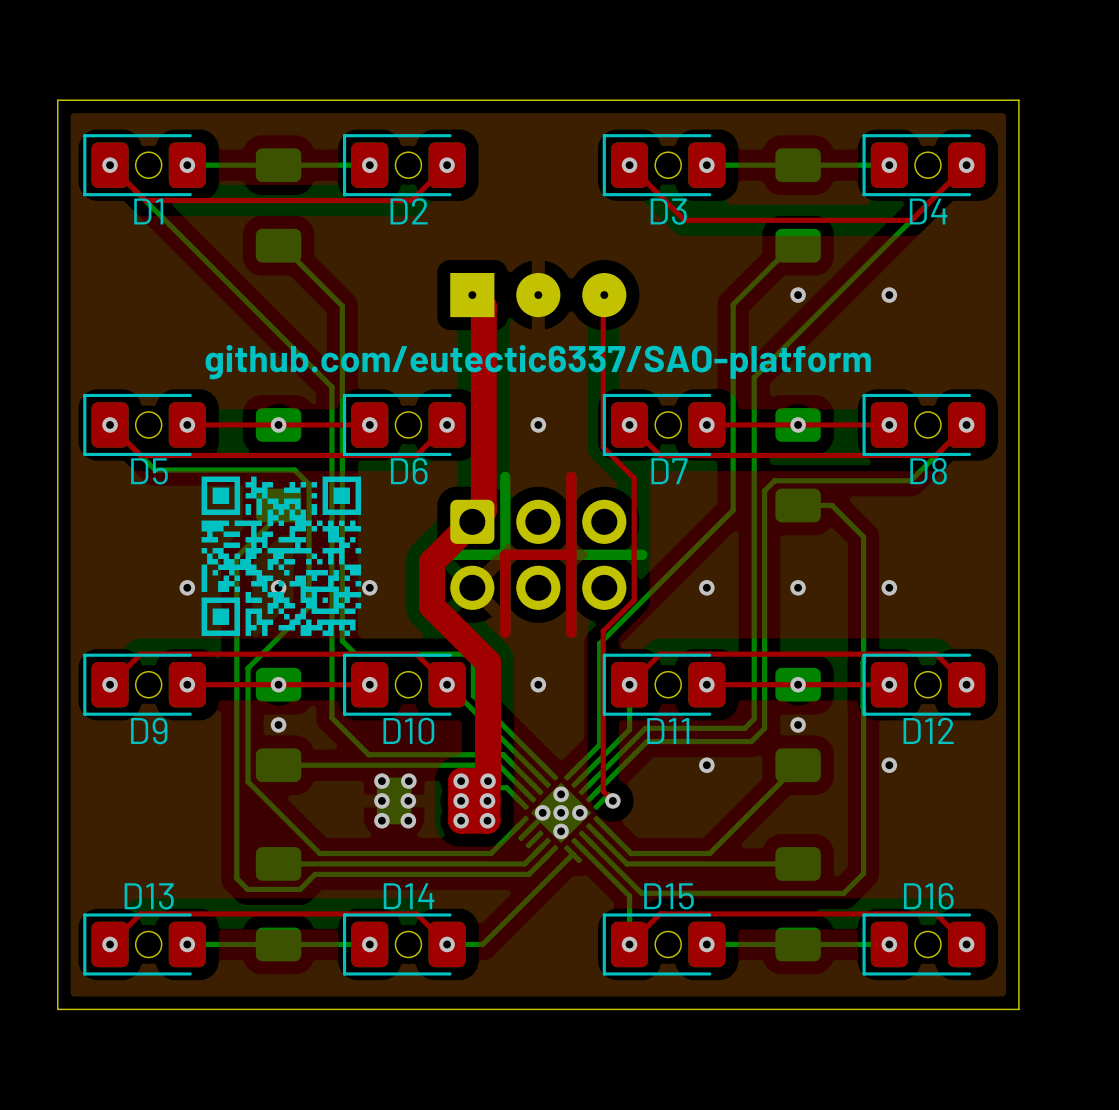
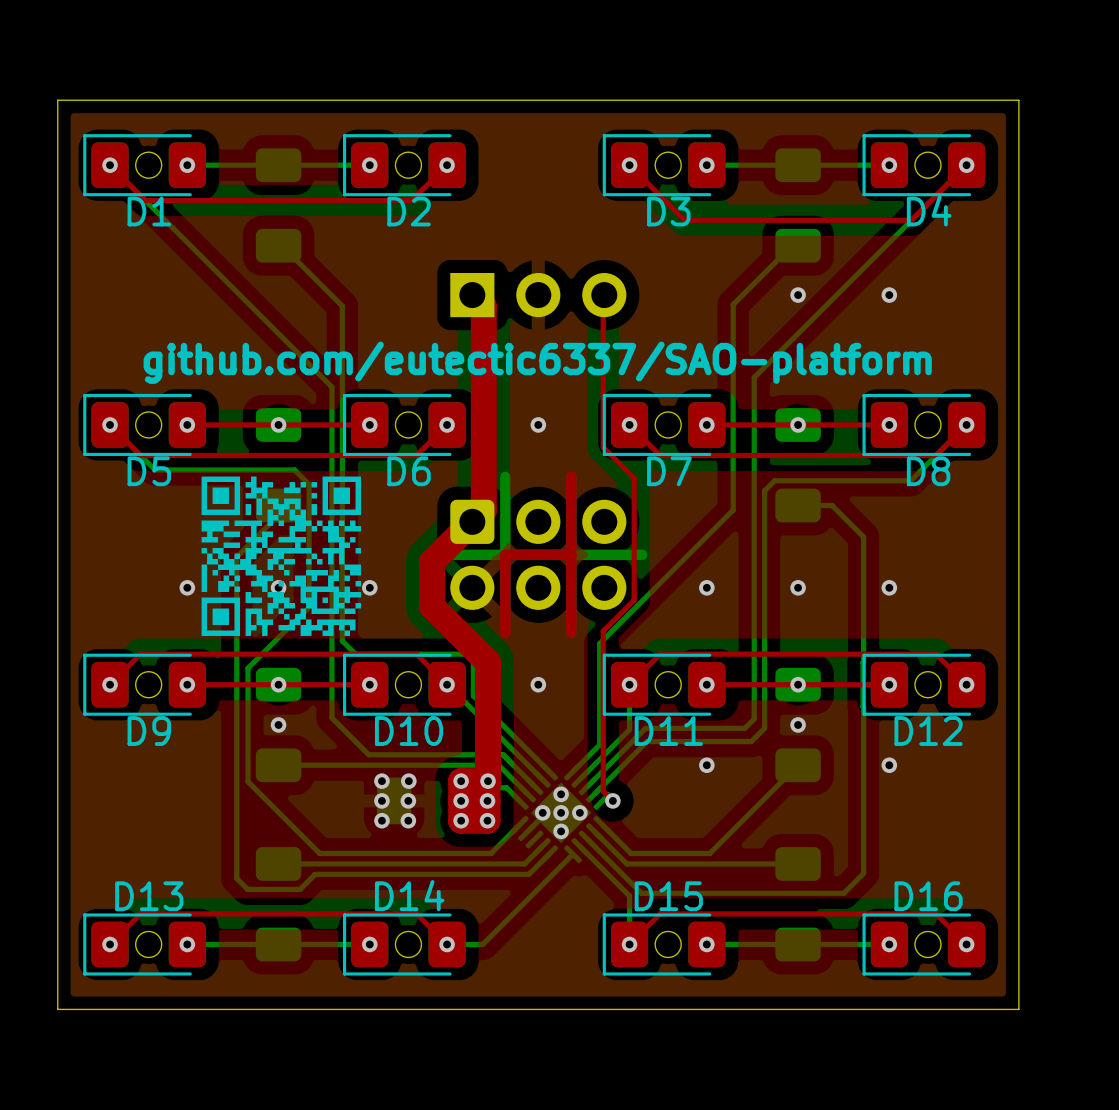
part footprint: [450, 272, 627, 318] -> [450, 272, 627, 318]

